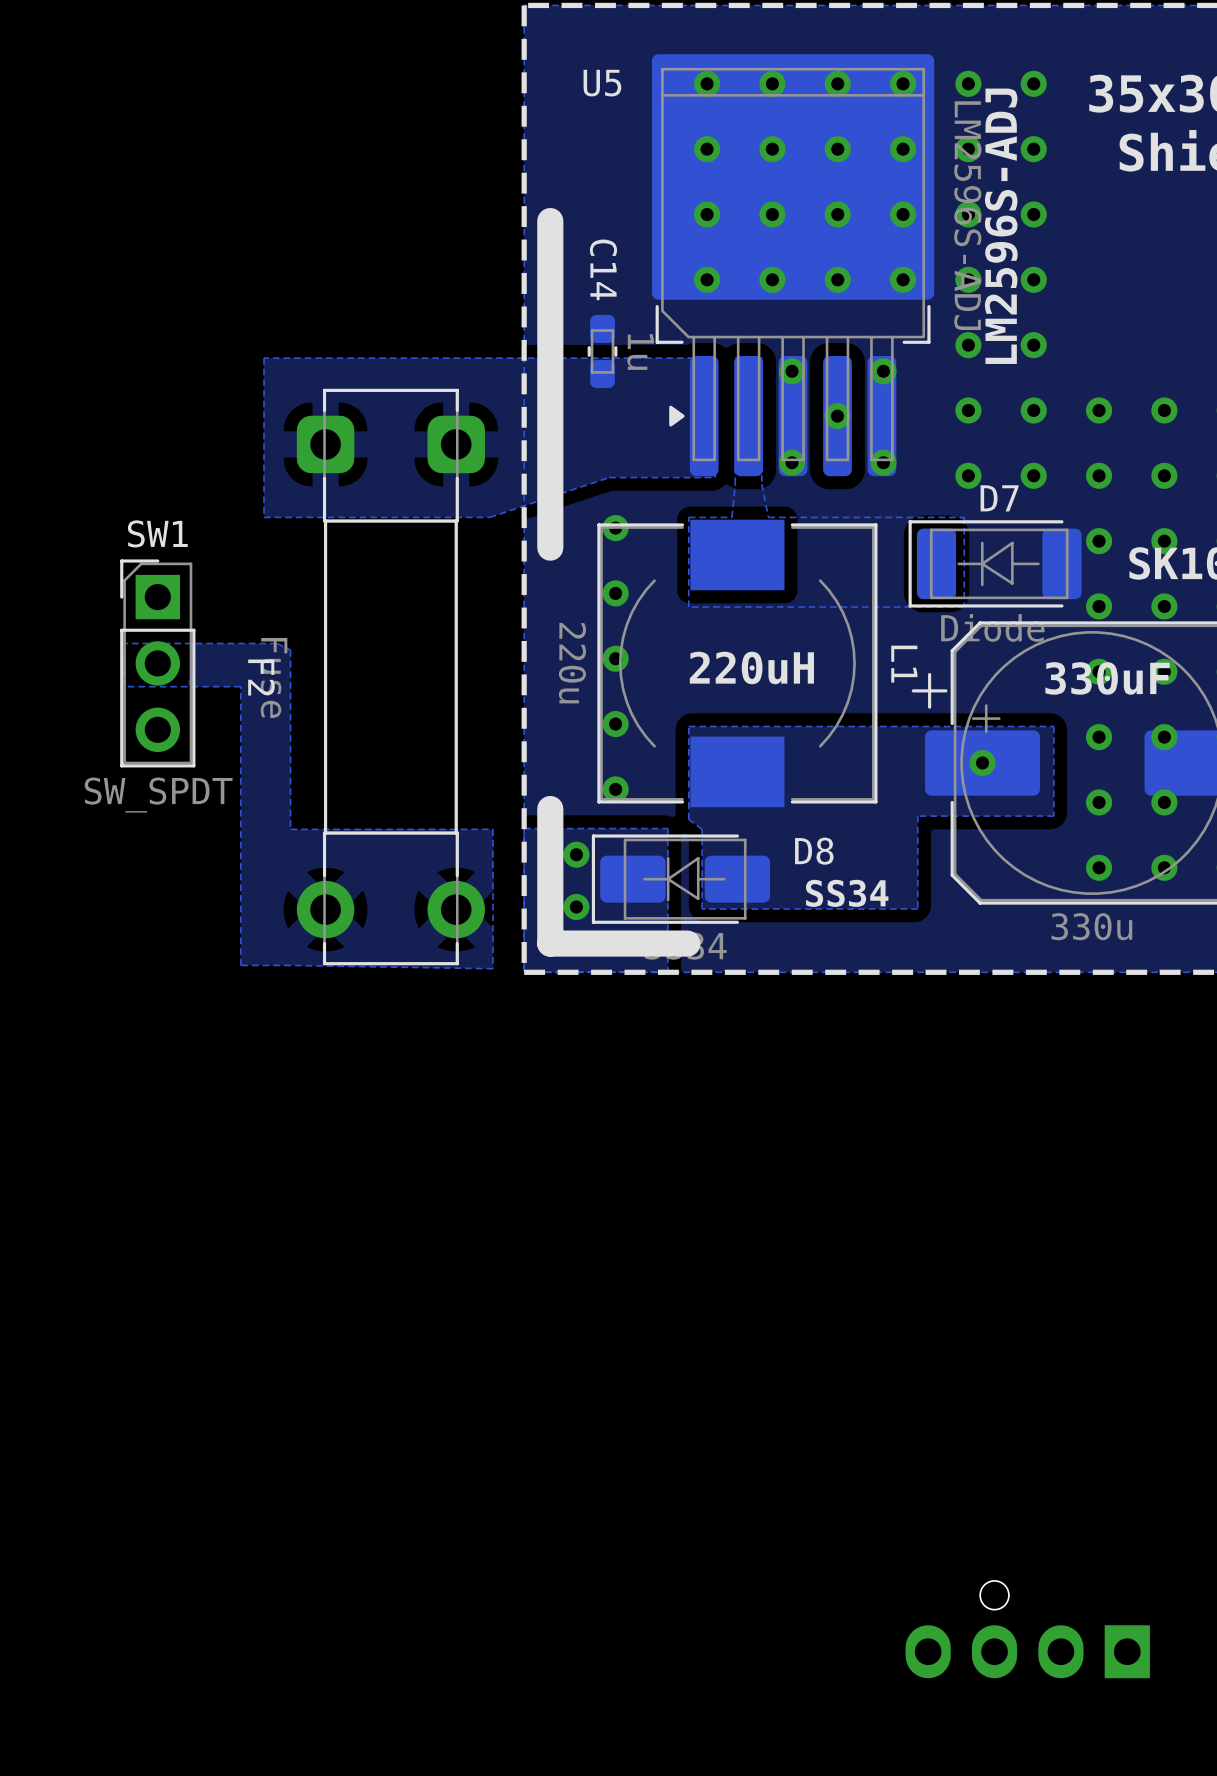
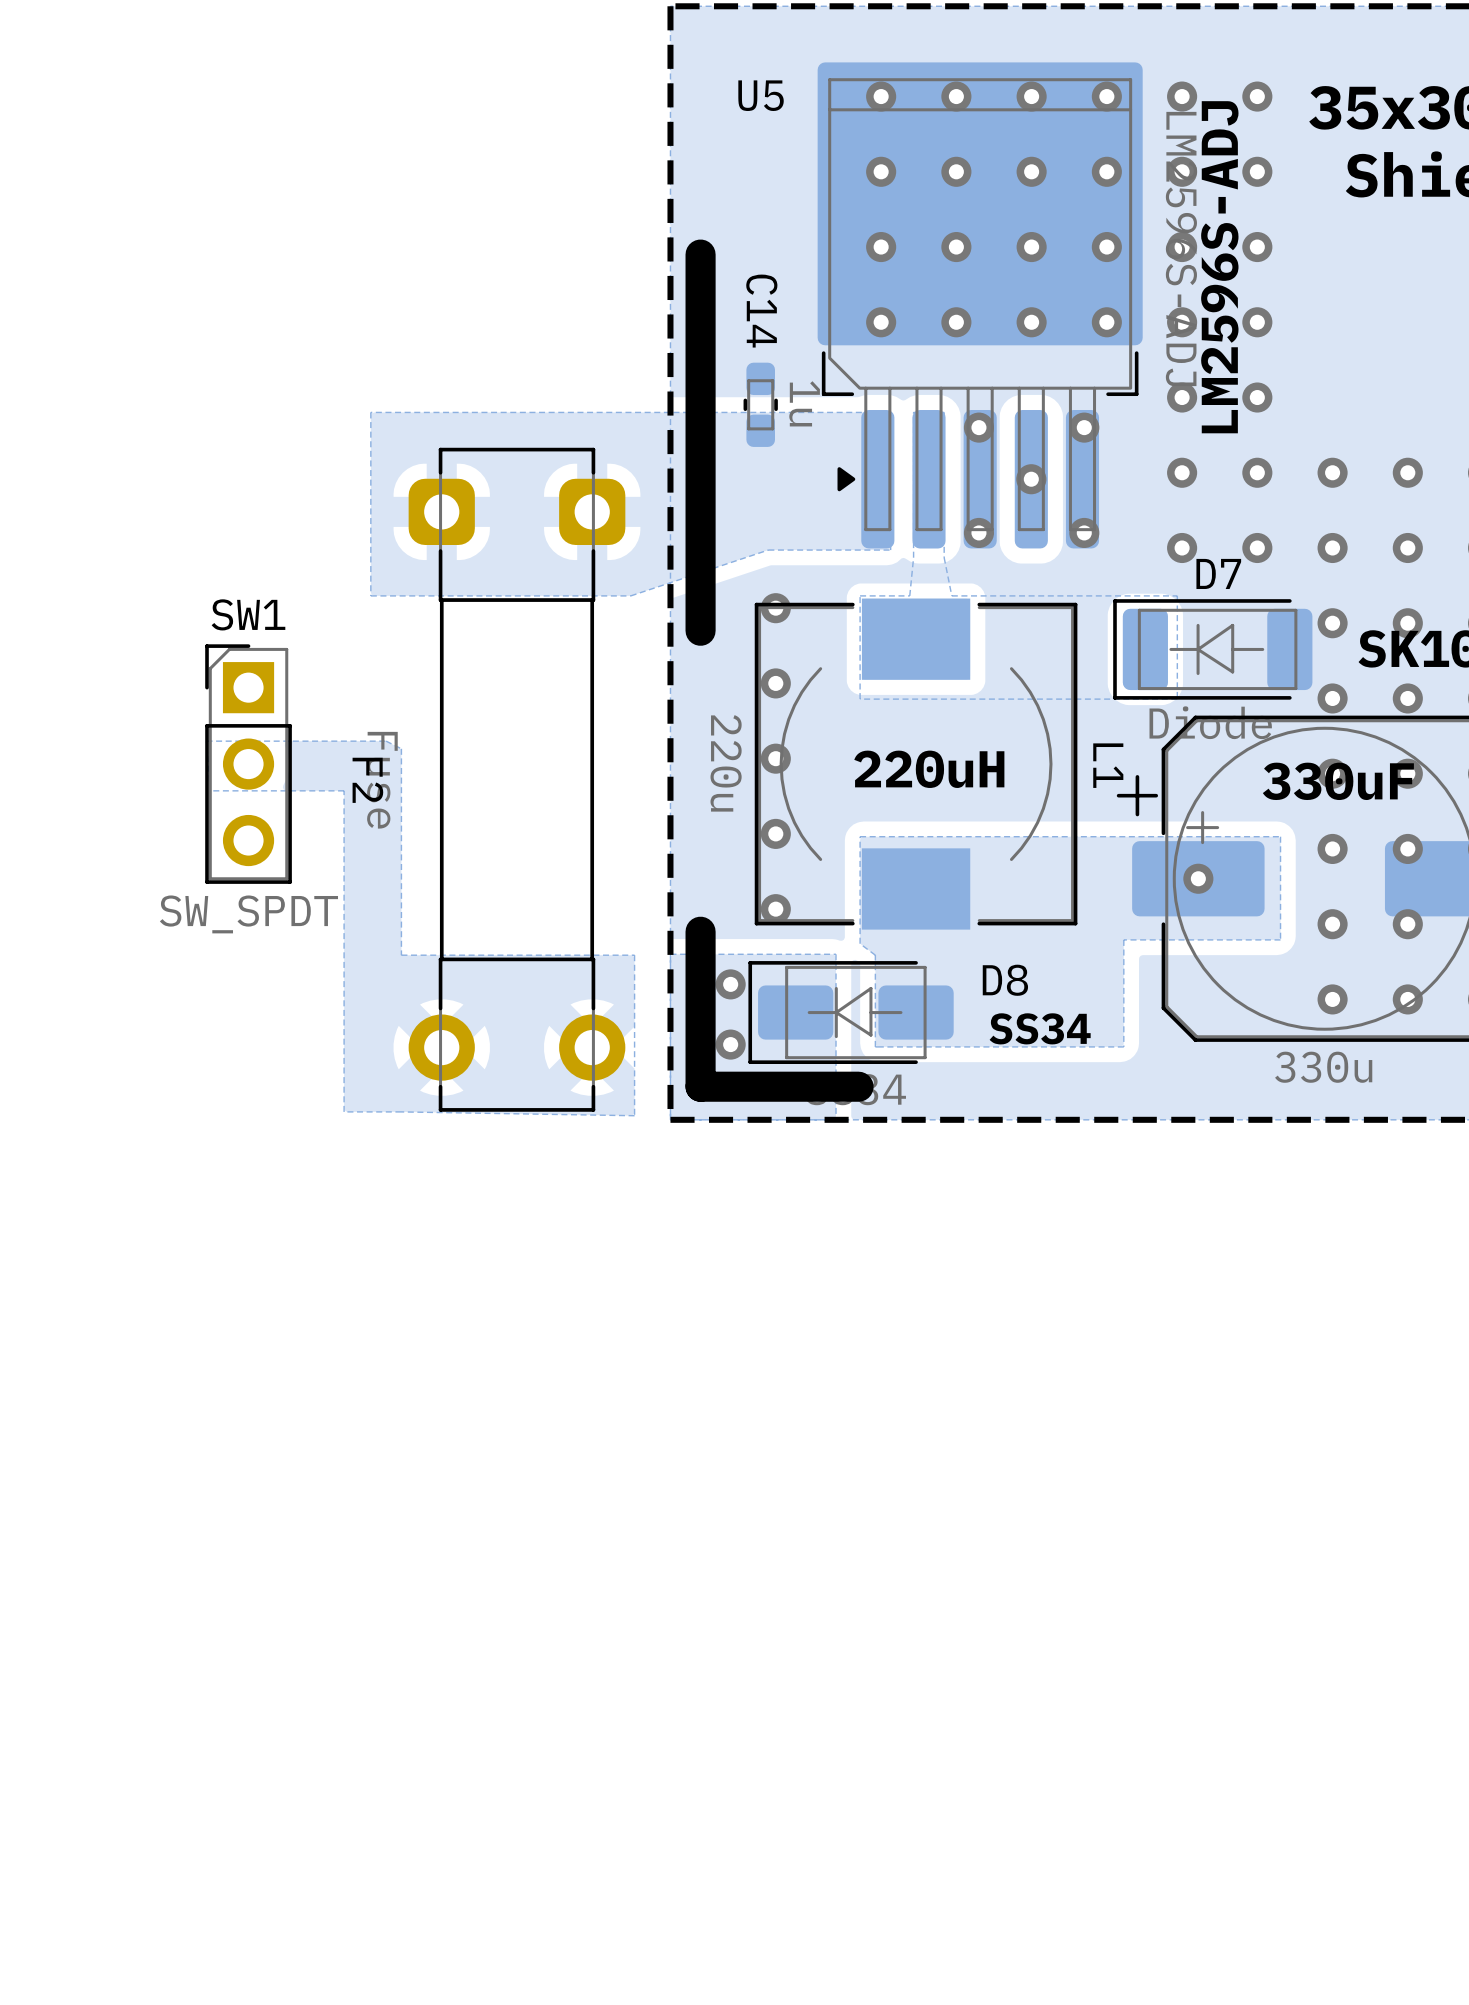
part: (1027, 1629) -> none

